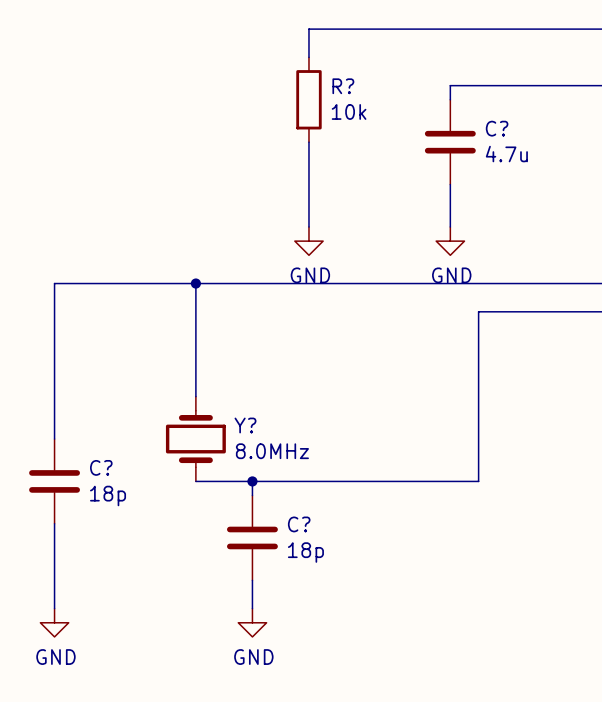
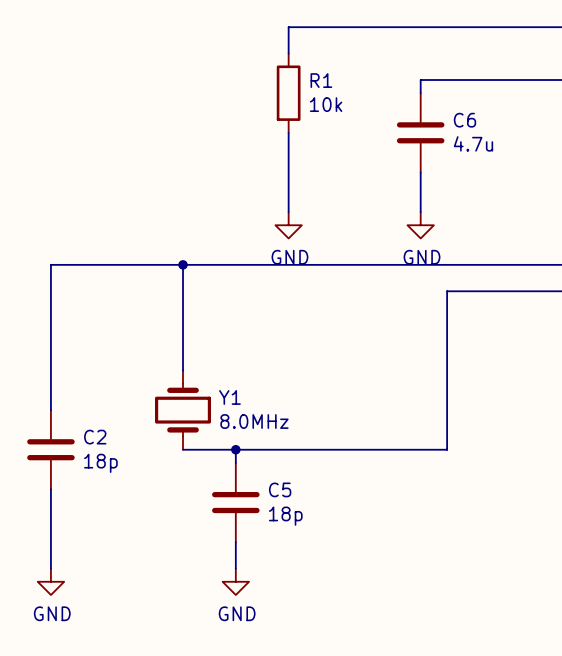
R? name: R? (343, 86) -> R1 (321, 80)
C? name: C? (497, 128) -> C6 (464, 120)
Y? name: Y? (245, 425) -> Y1 (229, 397)
C? name: C? (101, 467) -> C2 (95, 437)
C? name: C? (299, 524) -> C5 (280, 489)

